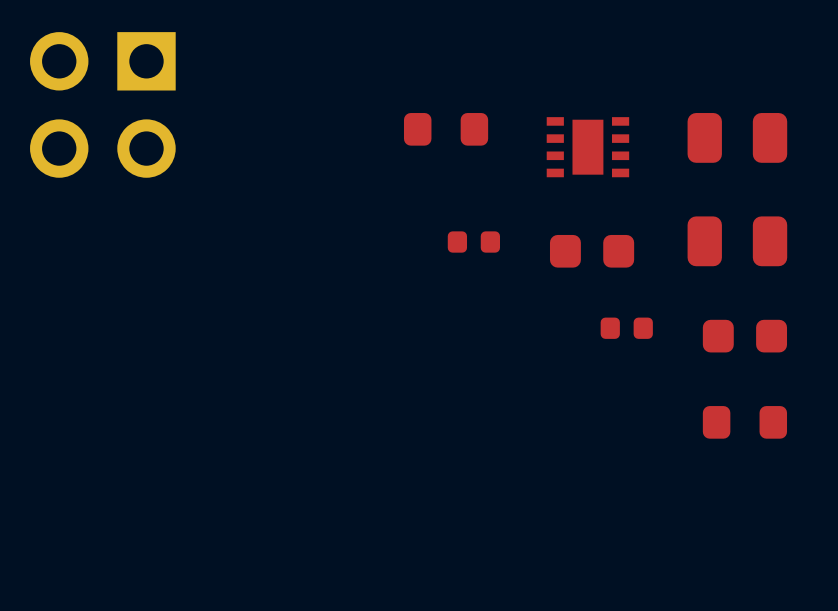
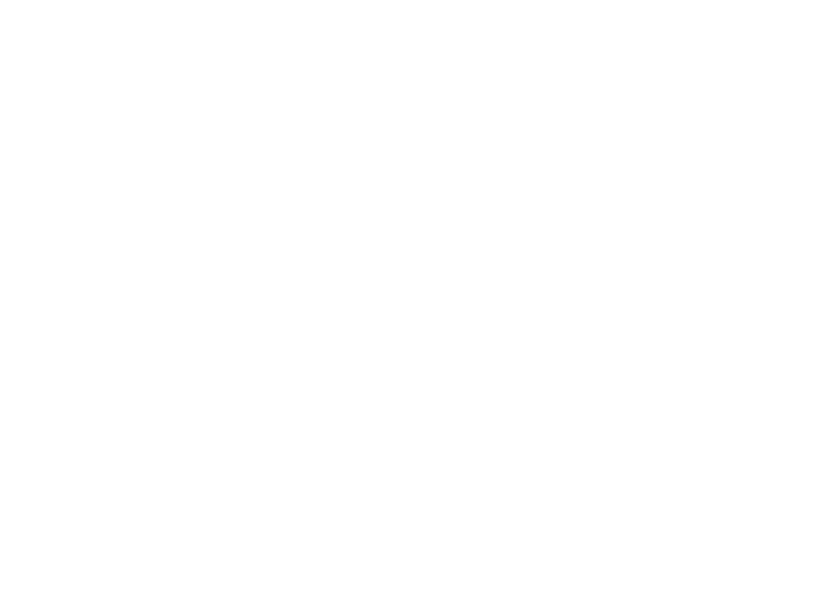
part: (102, 104) -> none
part: (446, 129) -> none
part: (737, 137) -> none
part: (587, 147) -> none
part: (737, 241) -> none
part: (473, 242) -> none
part: (592, 251) -> none
part: (626, 328) -> none
part: (744, 336) -> none
part: (744, 422) -> none

